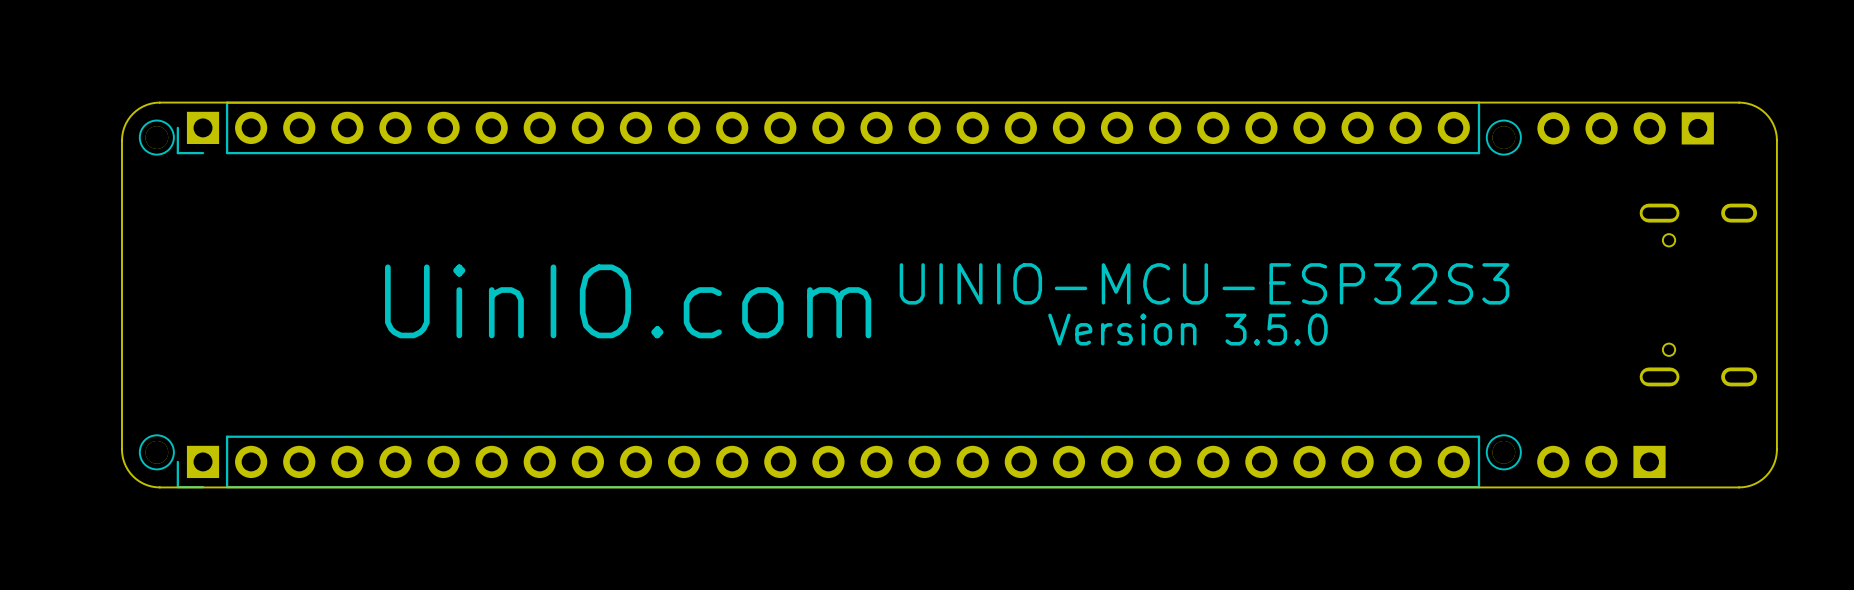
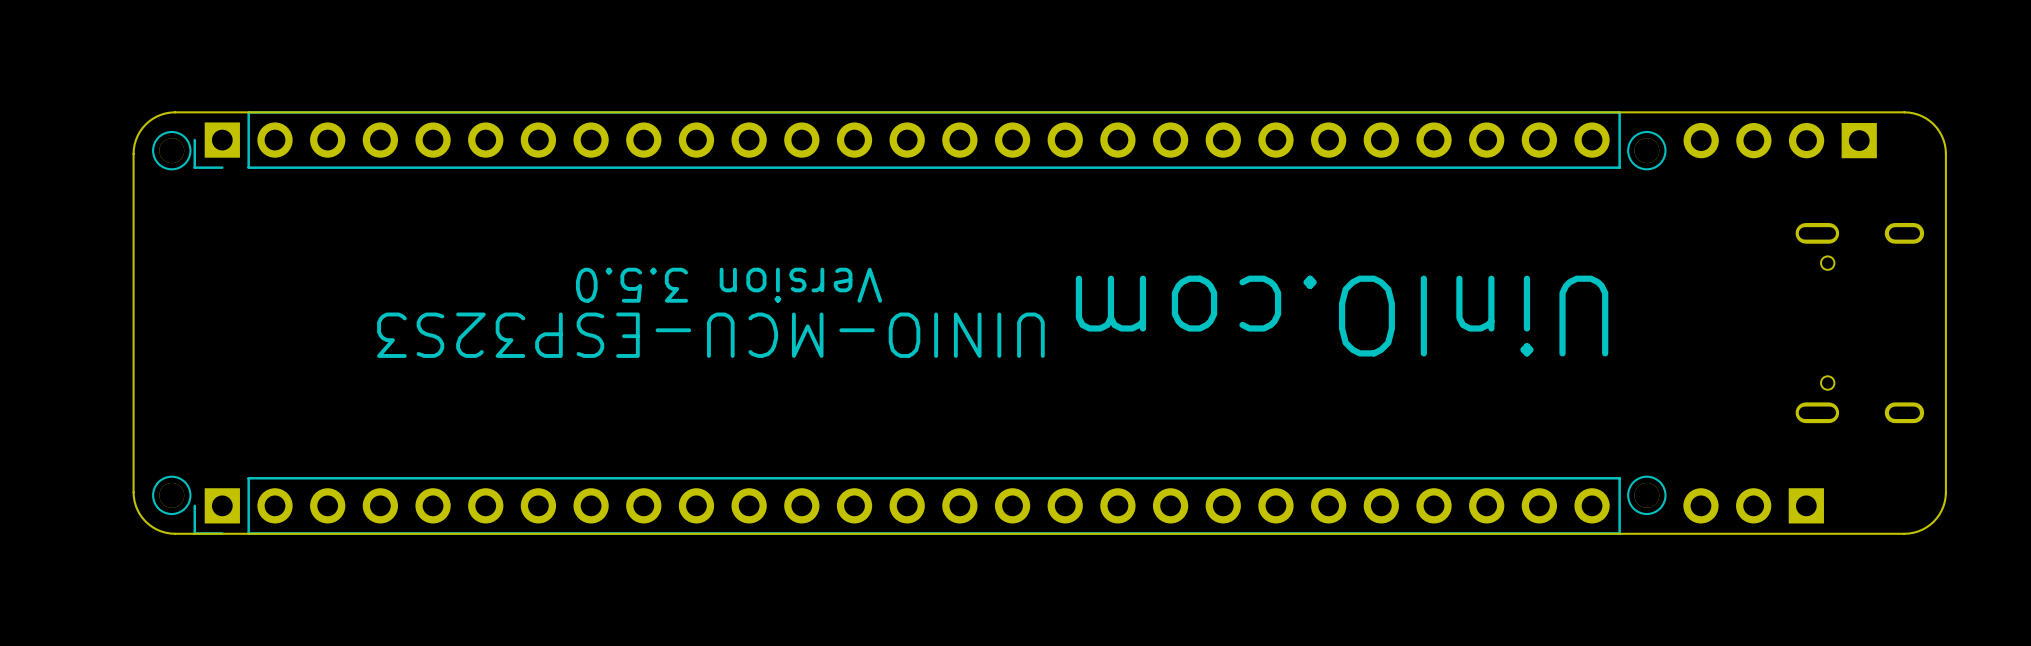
text rotation: 0° (1204, 283) -> 180° (710, 335)
text: none -> UinIO.com (1342, 316)
text: UinIO.com (628, 301) -> none
text rotation: 0° (1187, 329) -> 180° (729, 285)
text position: Version 3.5.0 (1187, 329) -> Version 3.5.0 (729, 285)

